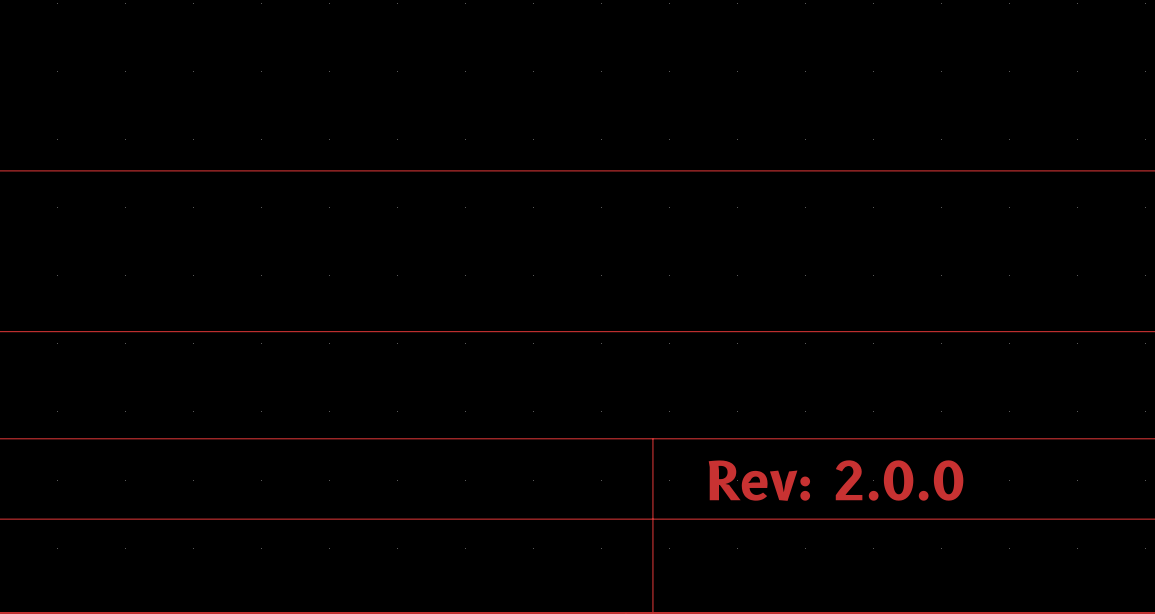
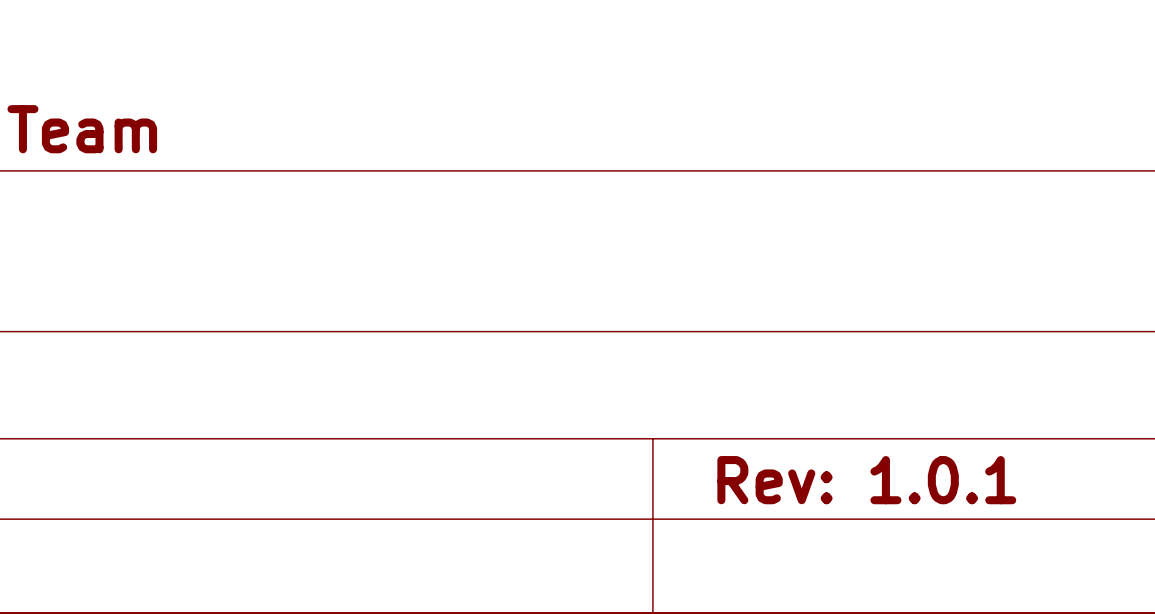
title block: Rev: 2.0.0 (836, 480) -> Rev: 1.0.1 (866, 480)

